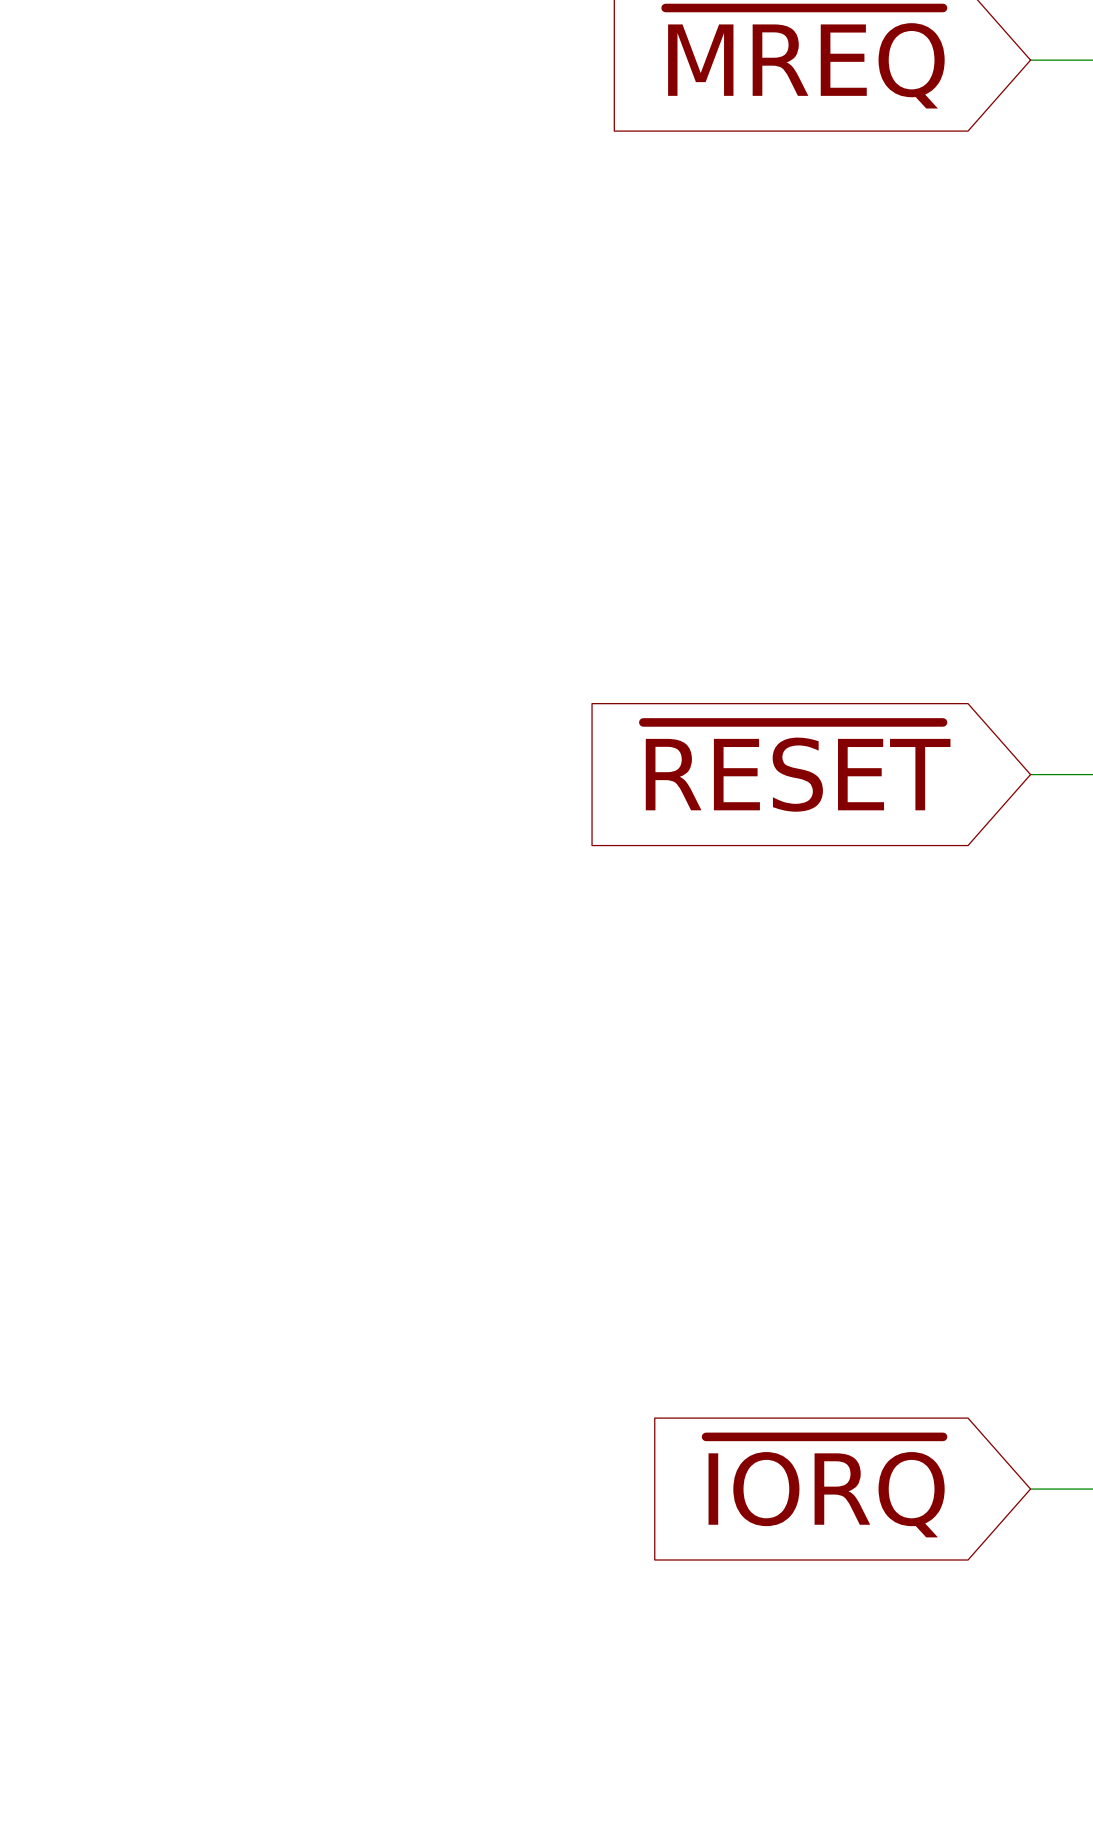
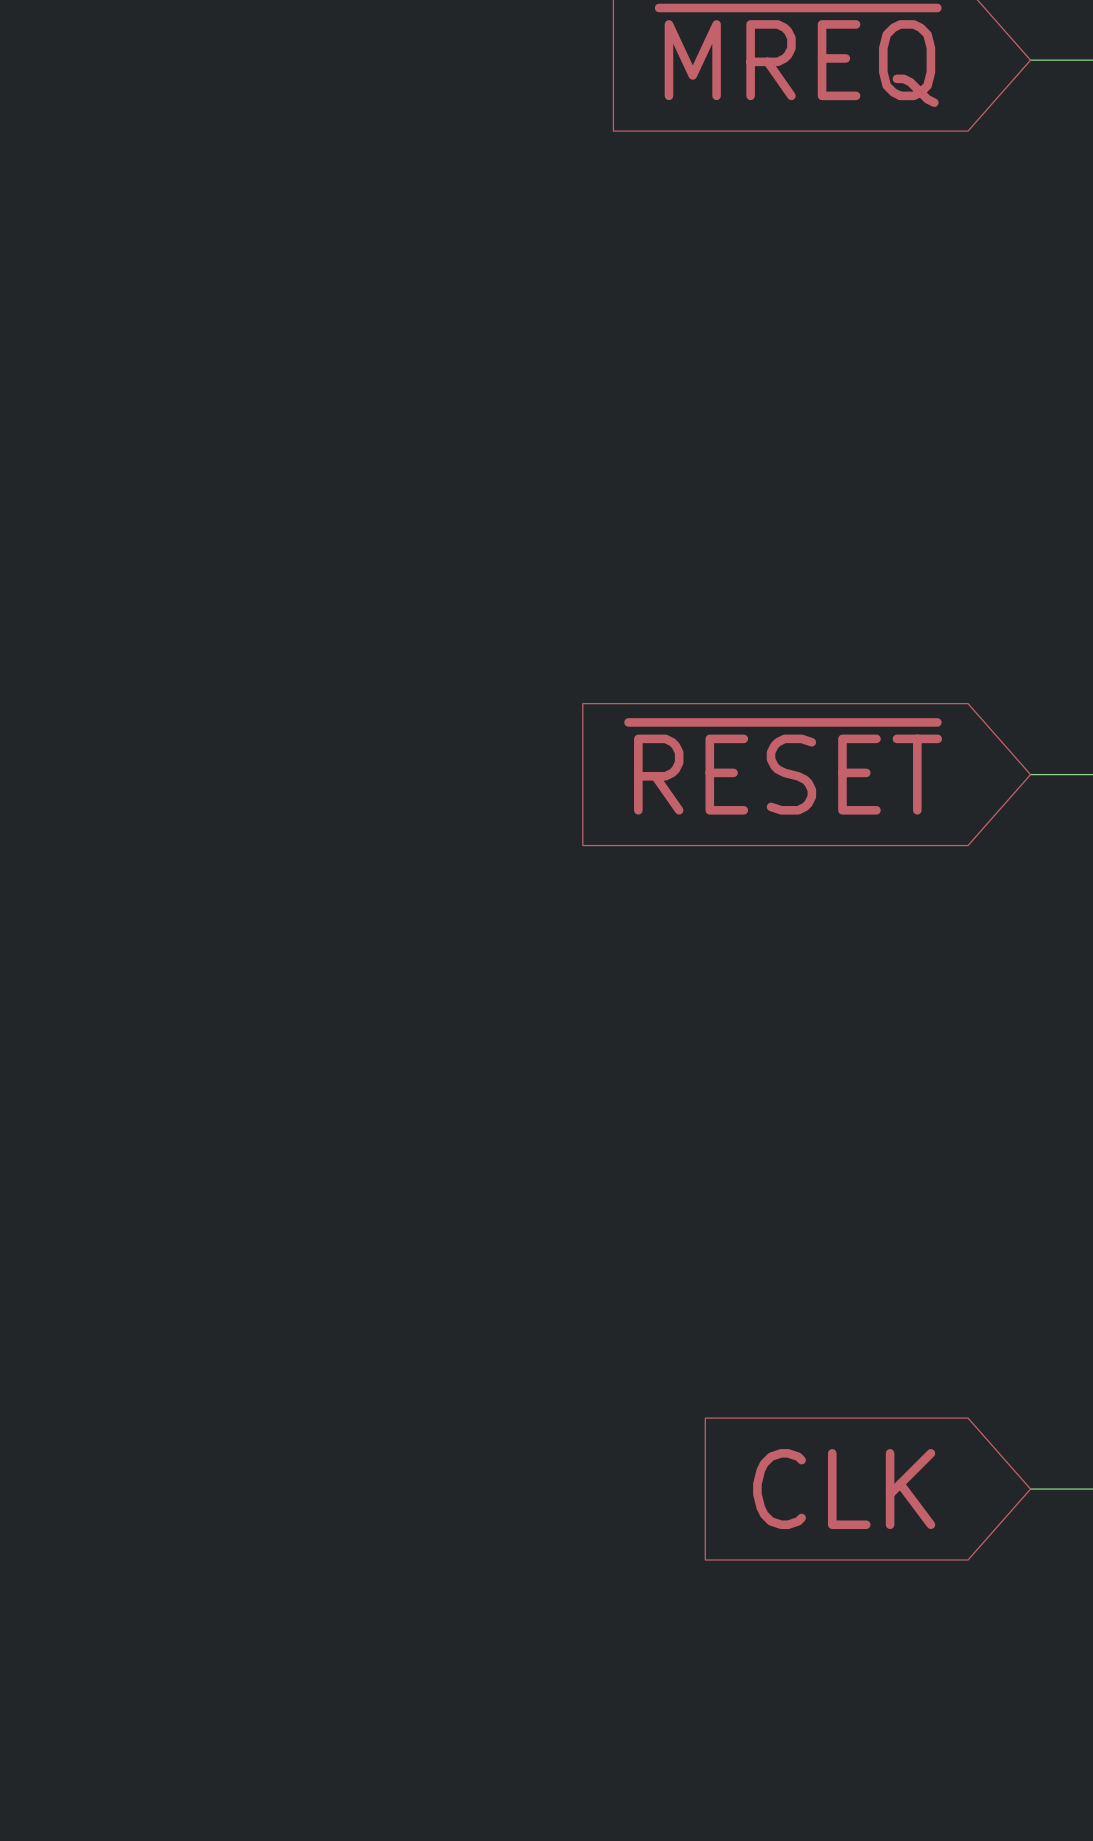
global label: ~{IORQ} (825, 1487) -> CLK (844, 1489)

